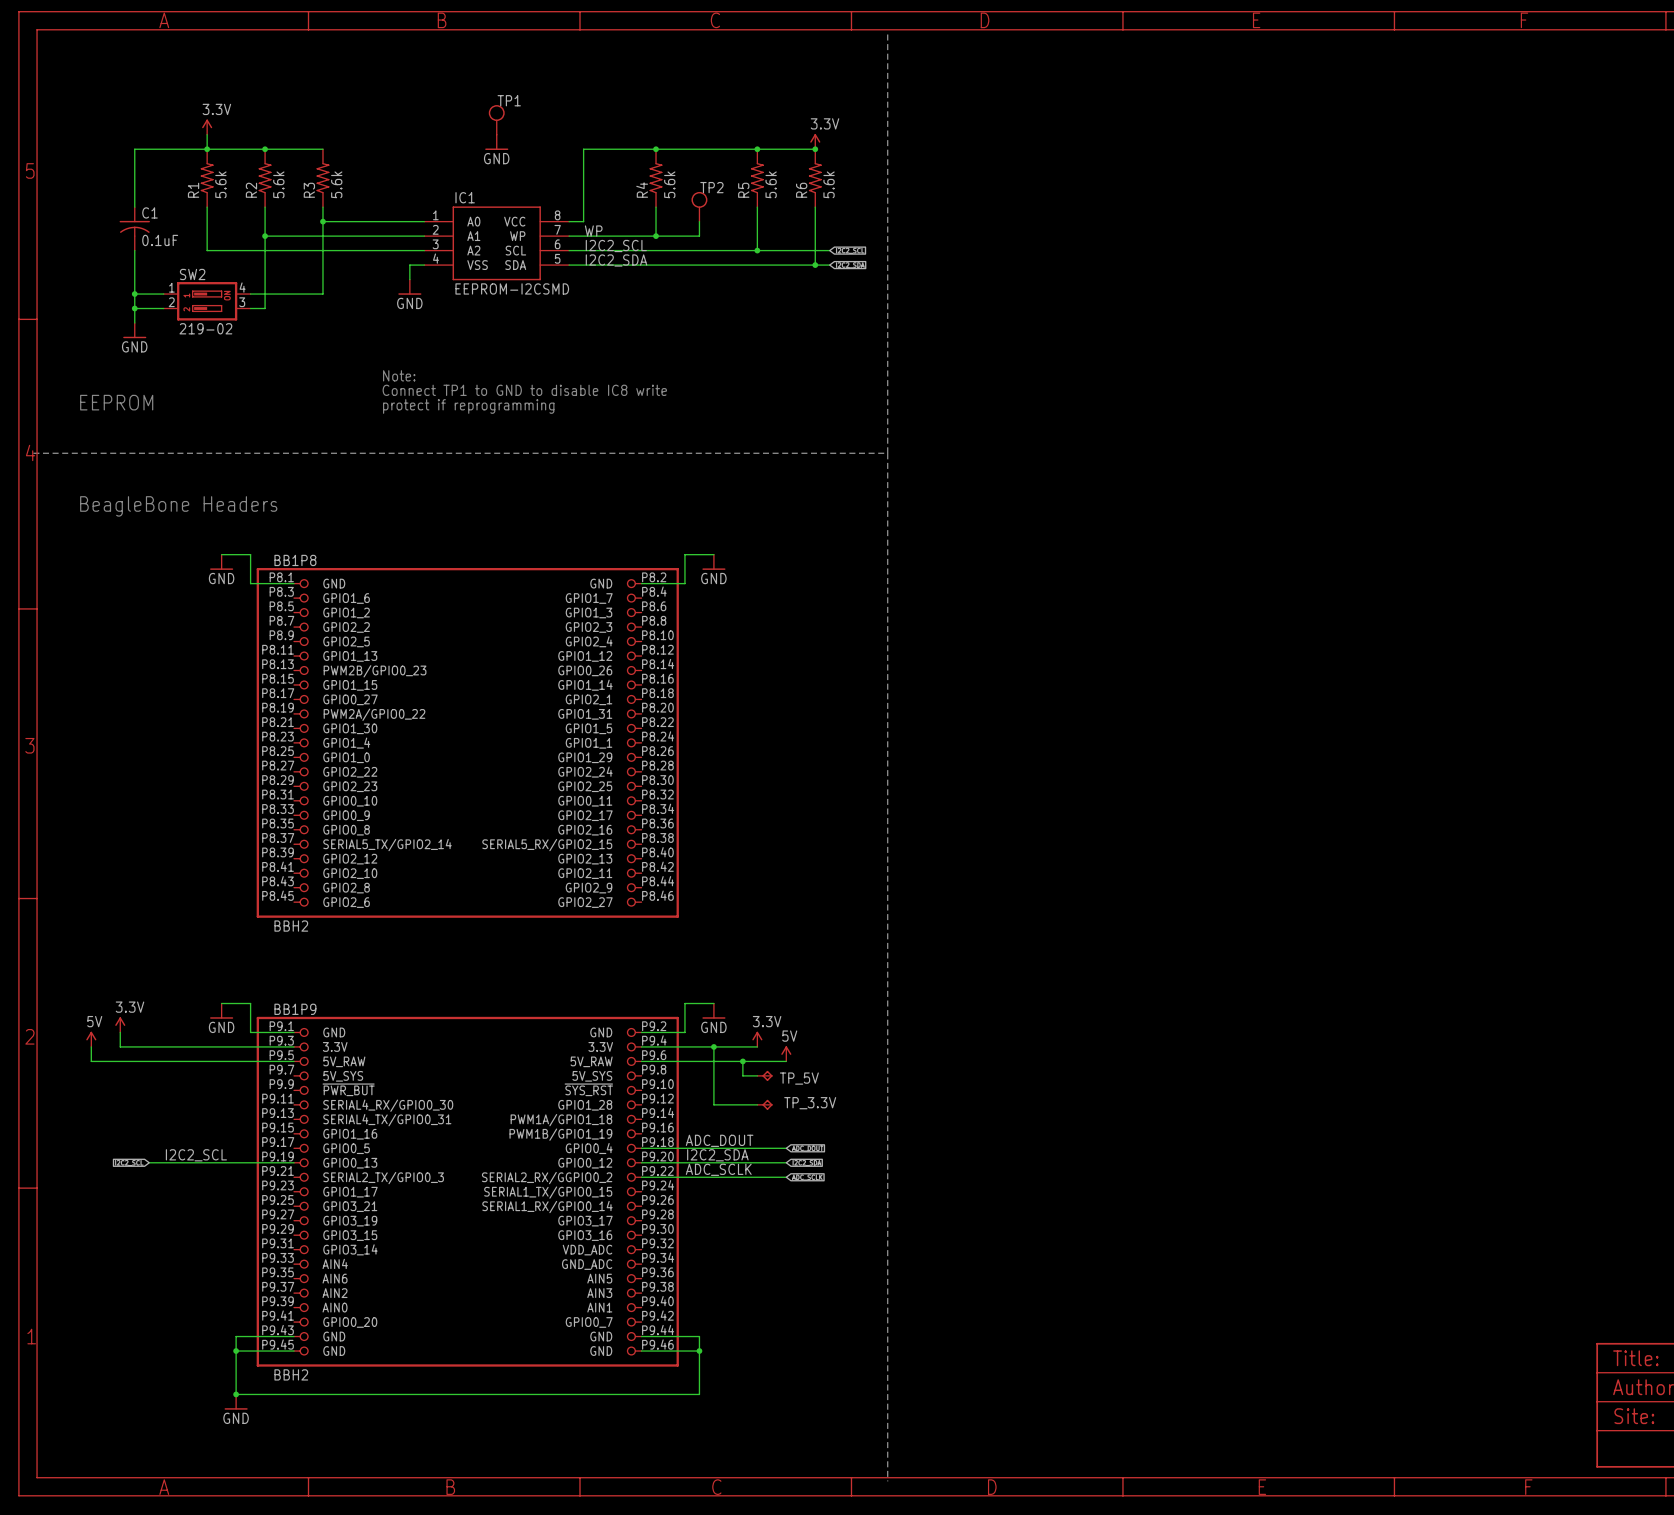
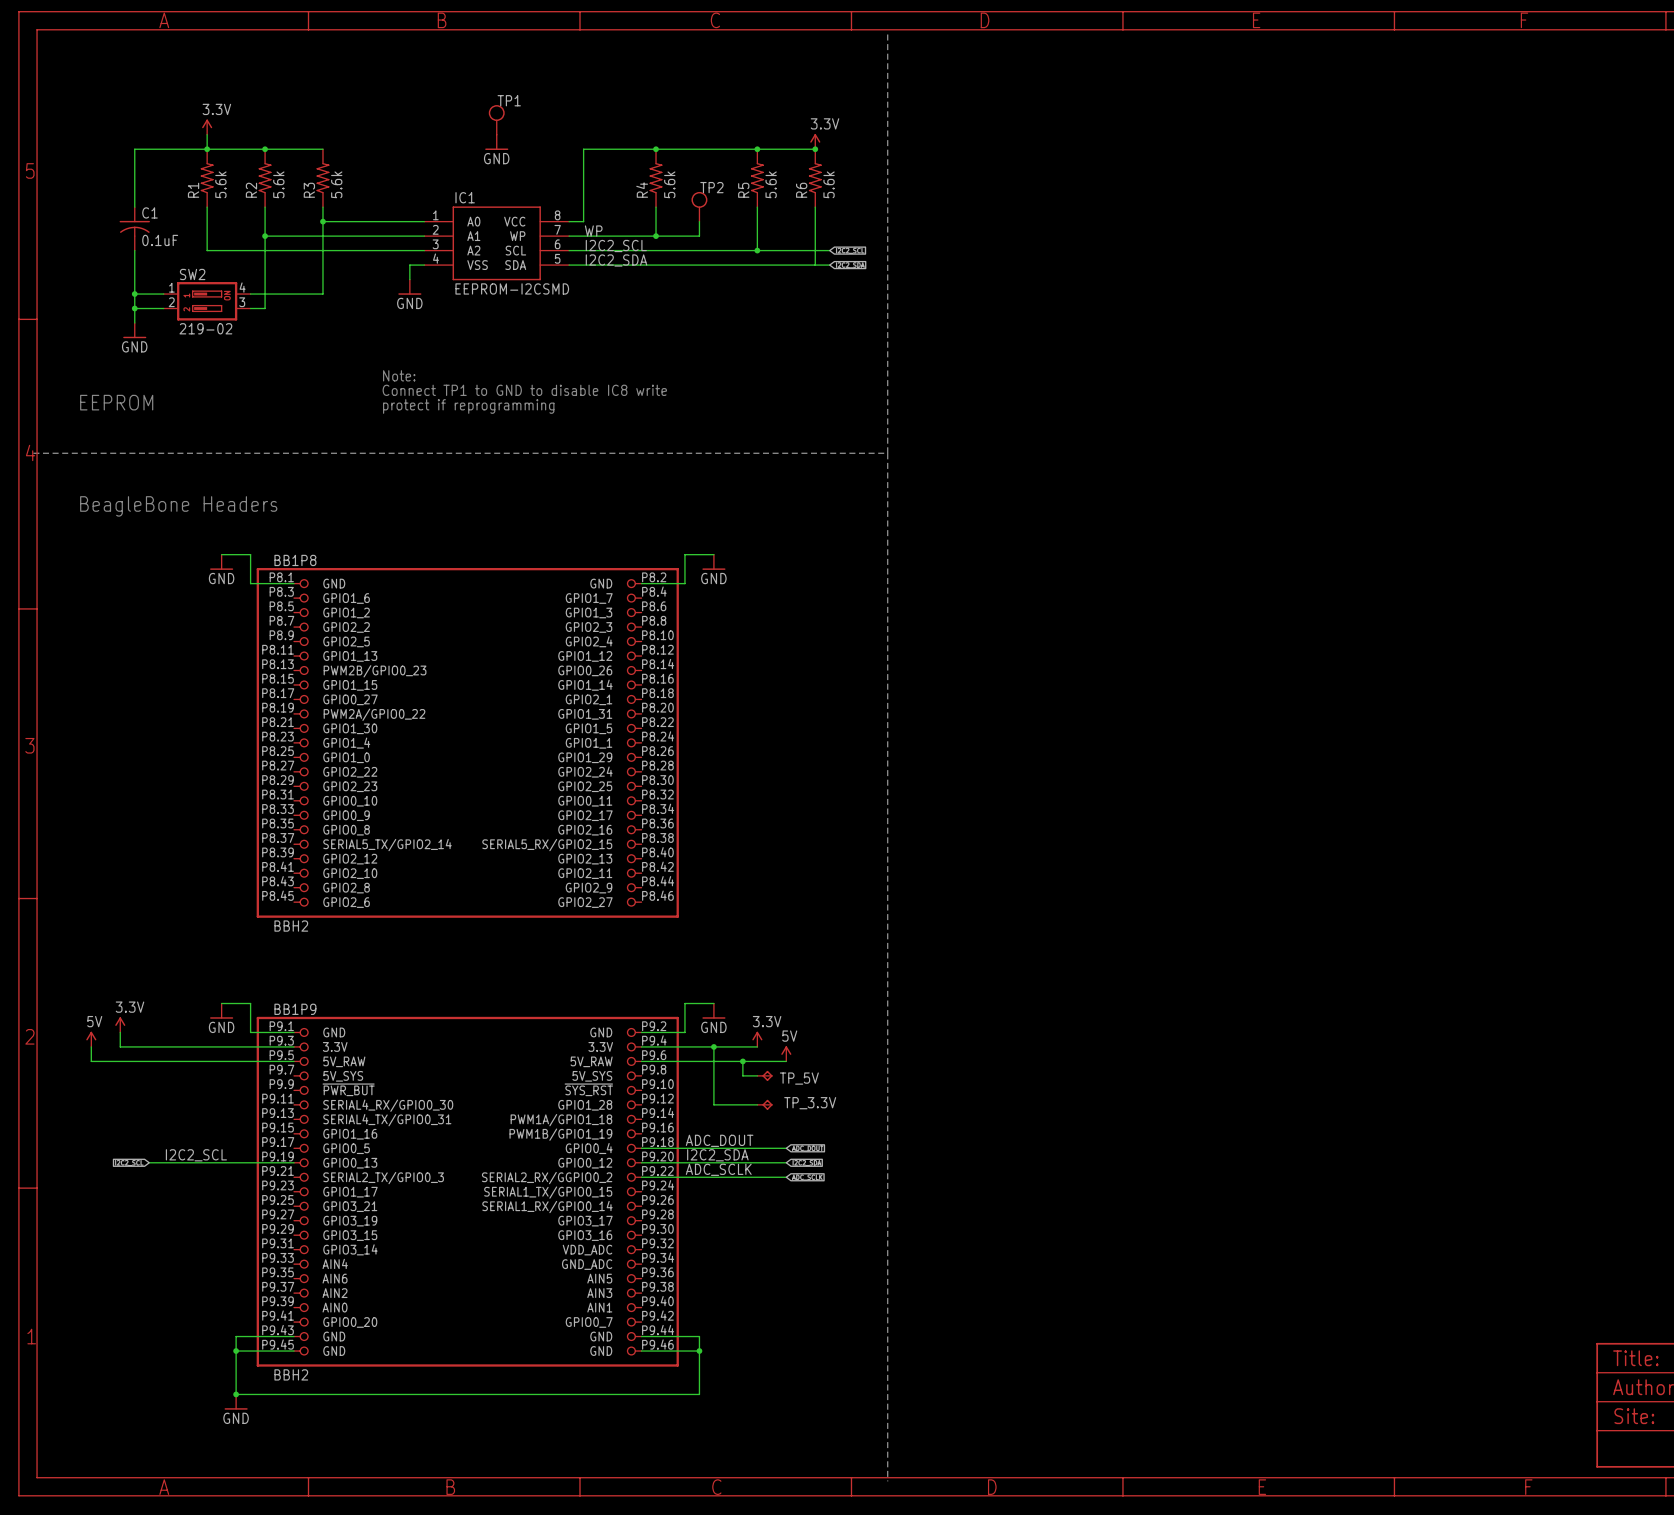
junction: (815, 265) -> none

